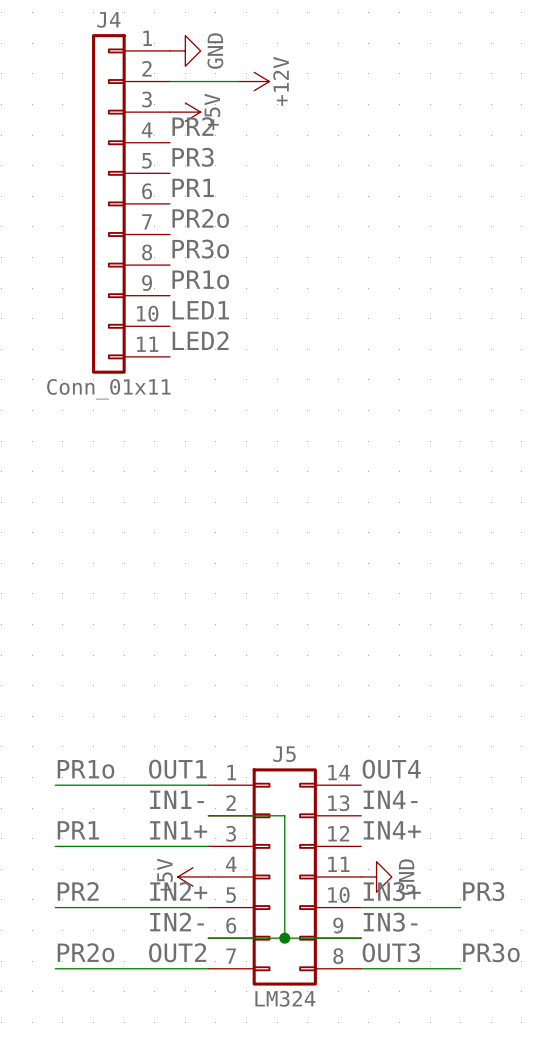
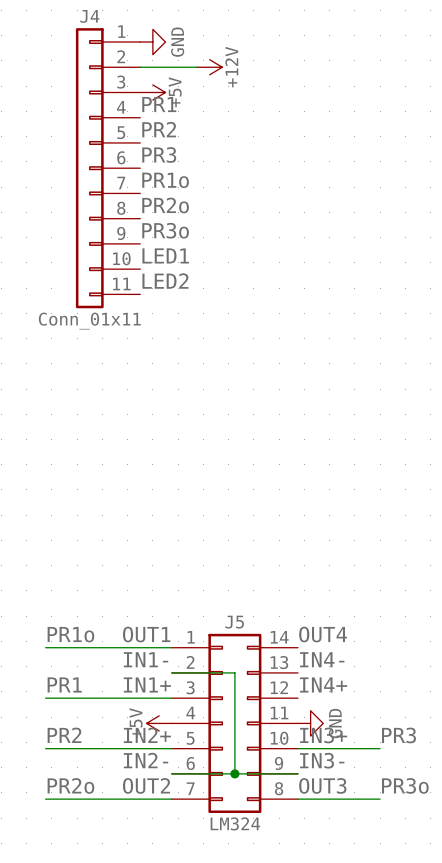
label: PR2 (192, 126) -> PR1 (159, 104)
label: PR3 (193, 157) -> PR2 (159, 129)
label: PR1 (193, 187) -> PR3 (159, 155)
label: PR2o (200, 218) -> PR1o (165, 180)
label: PR3o (200, 249) -> PR2o (165, 205)
label: PR1o (200, 279) -> PR3o (165, 230)

